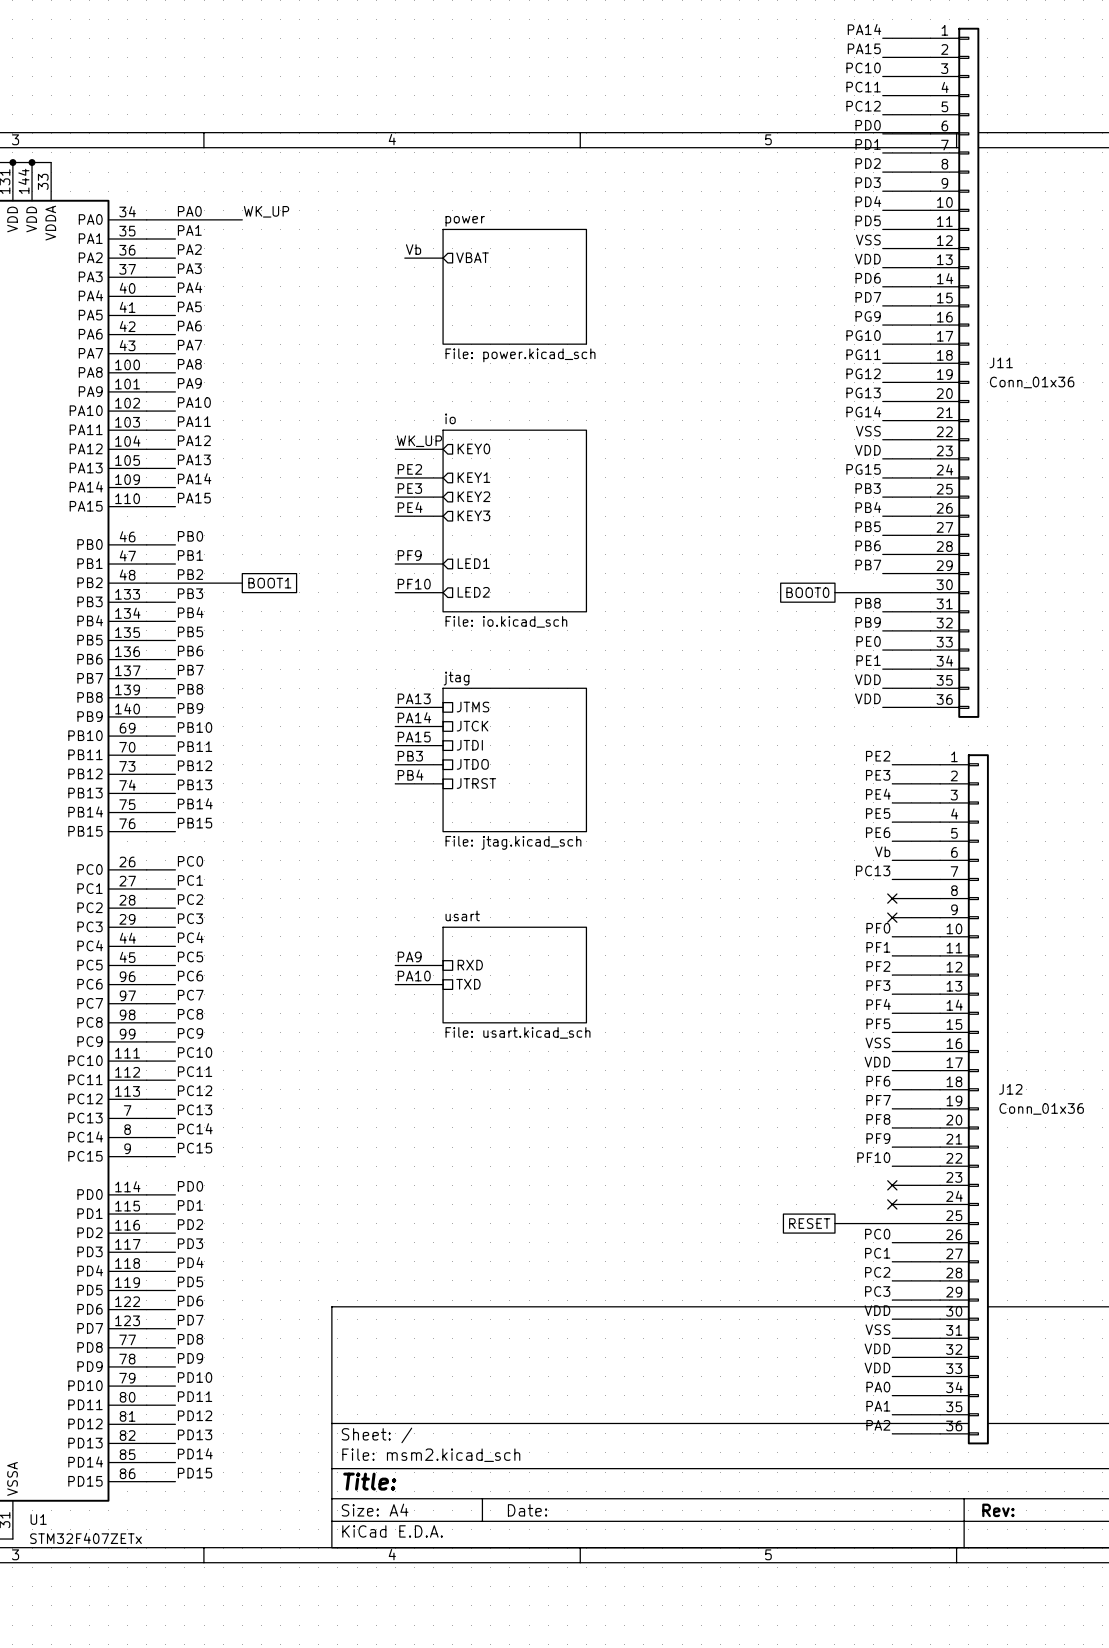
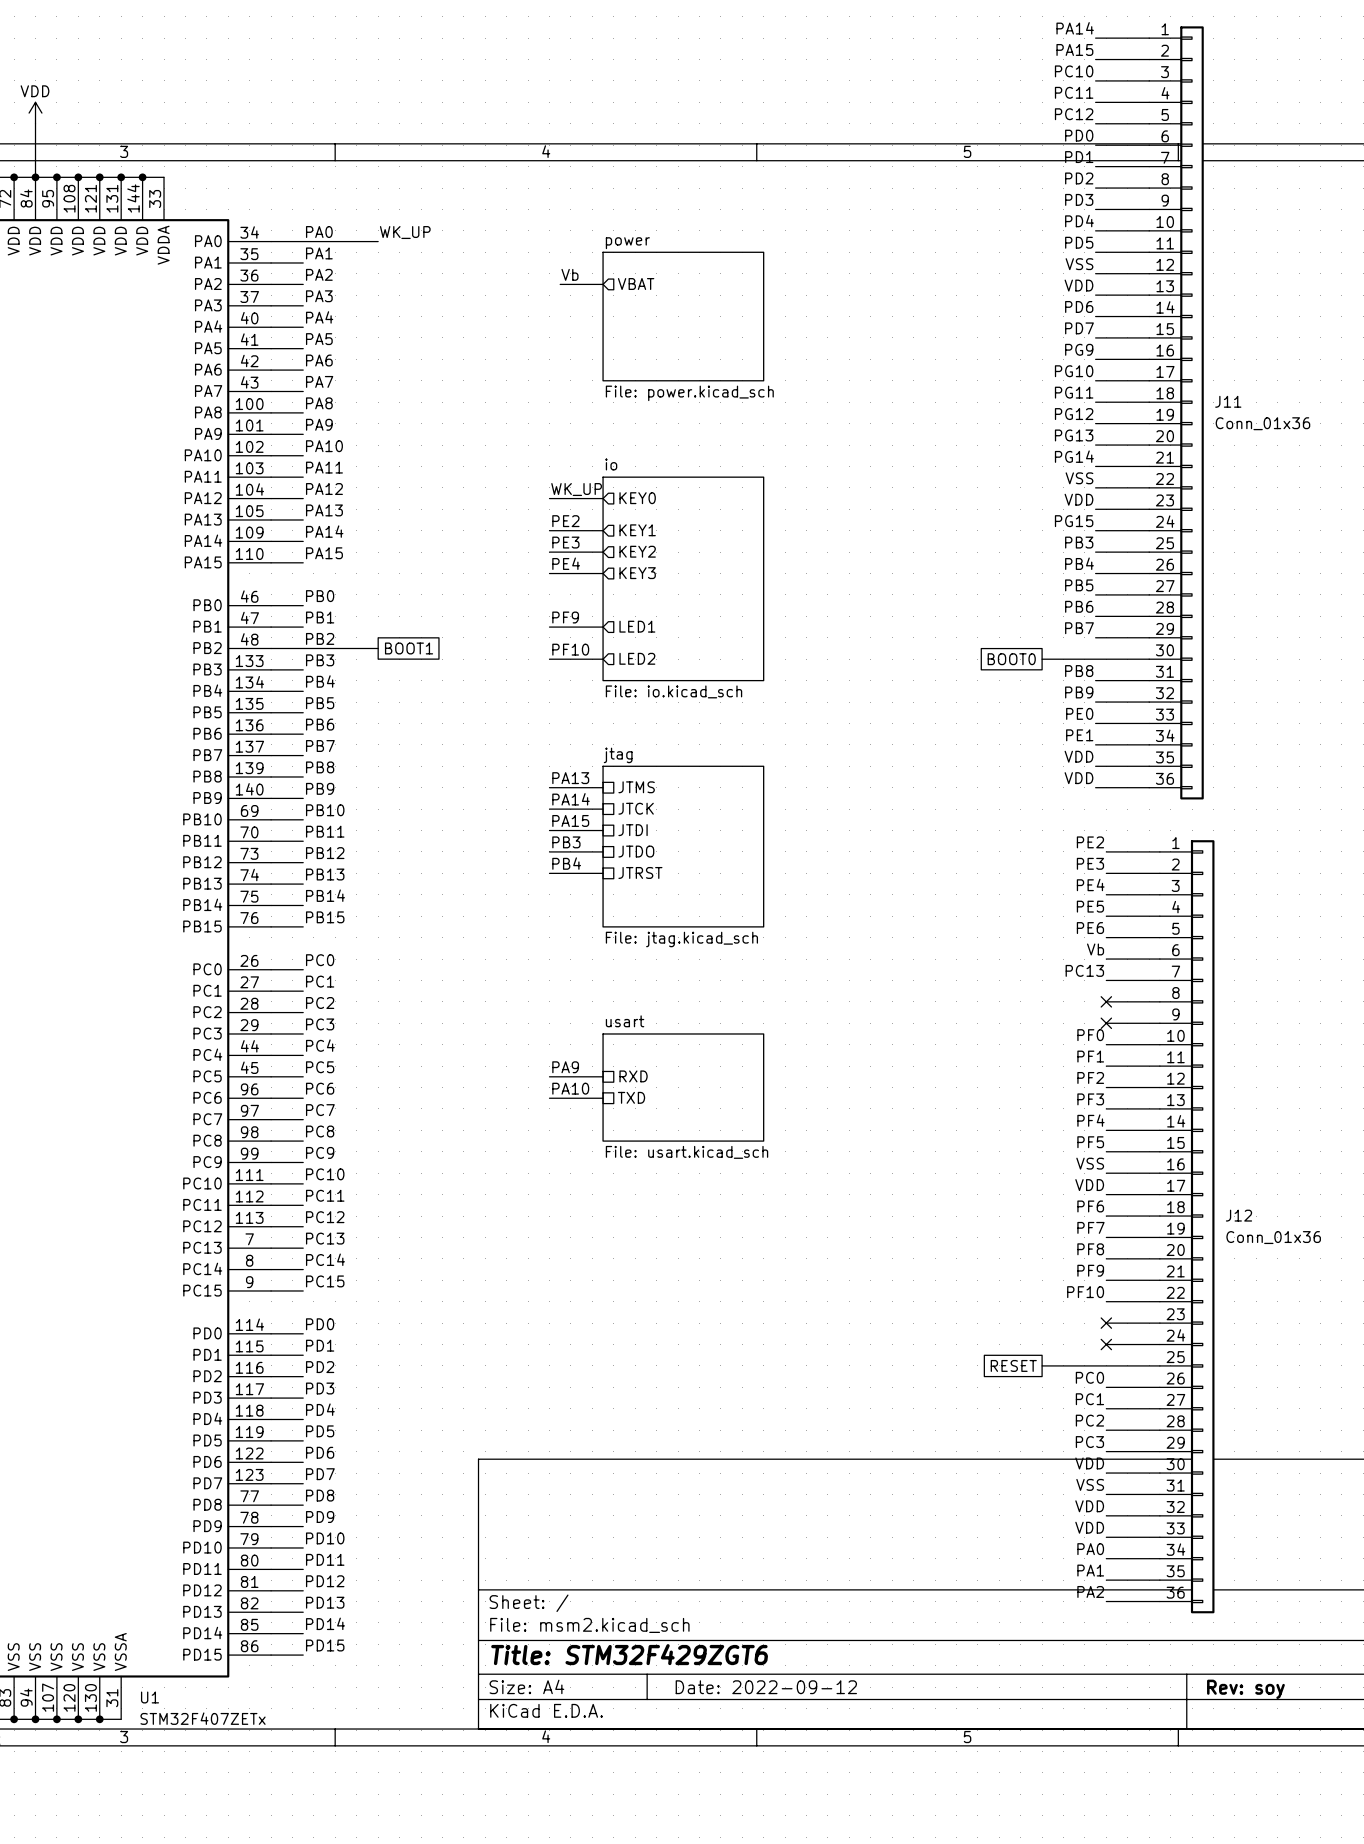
title block: Title: (369, 1481) -> Title: STM32F429ZGT6 (629, 1654)
title block: Date: (527, 1510) -> Date: 2022-09-12 (766, 1687)
title block: Rev: (998, 1510) -> Rev: soy (1245, 1689)

